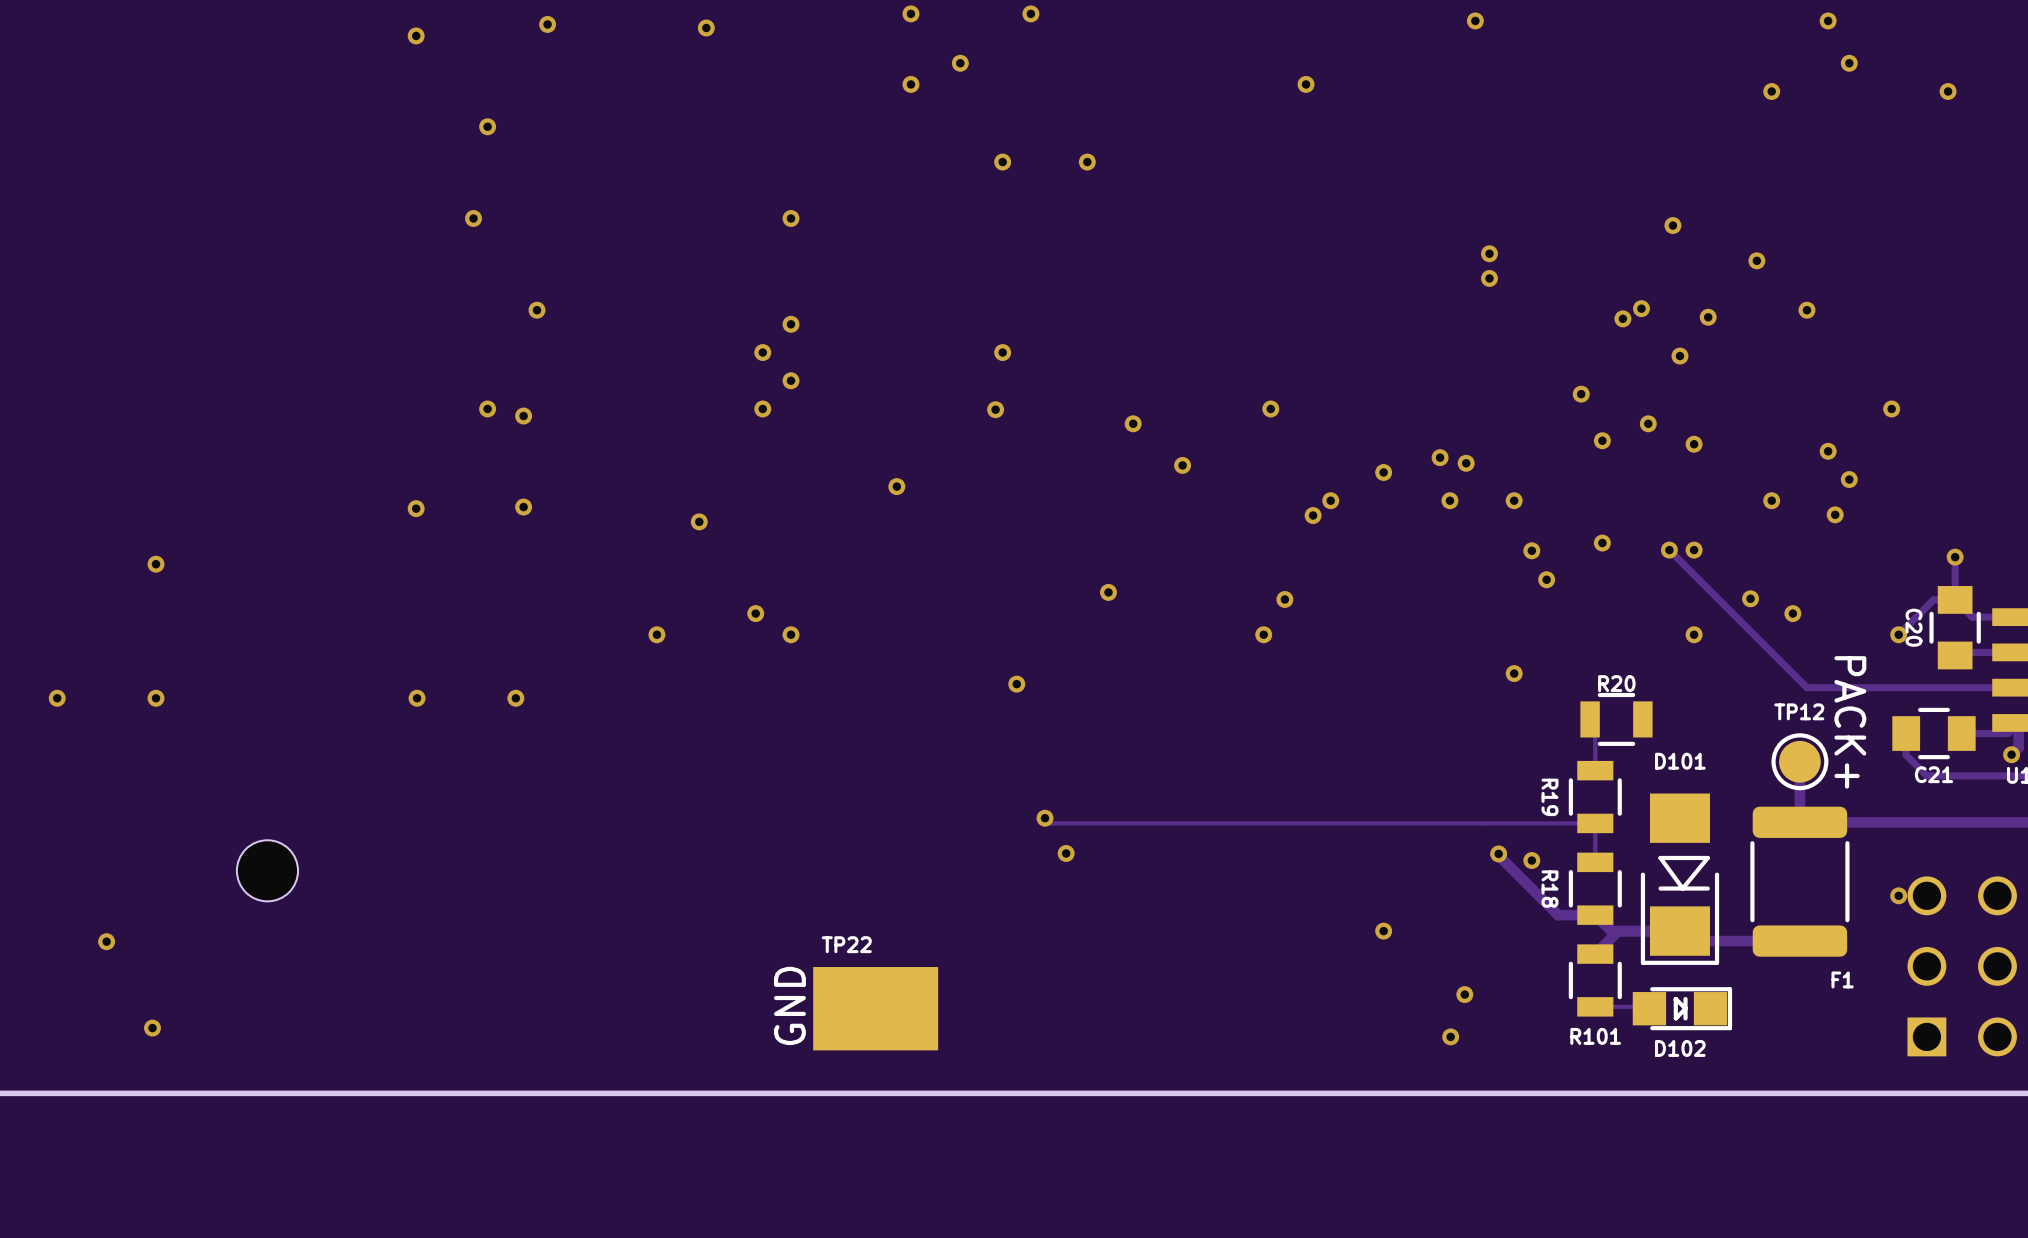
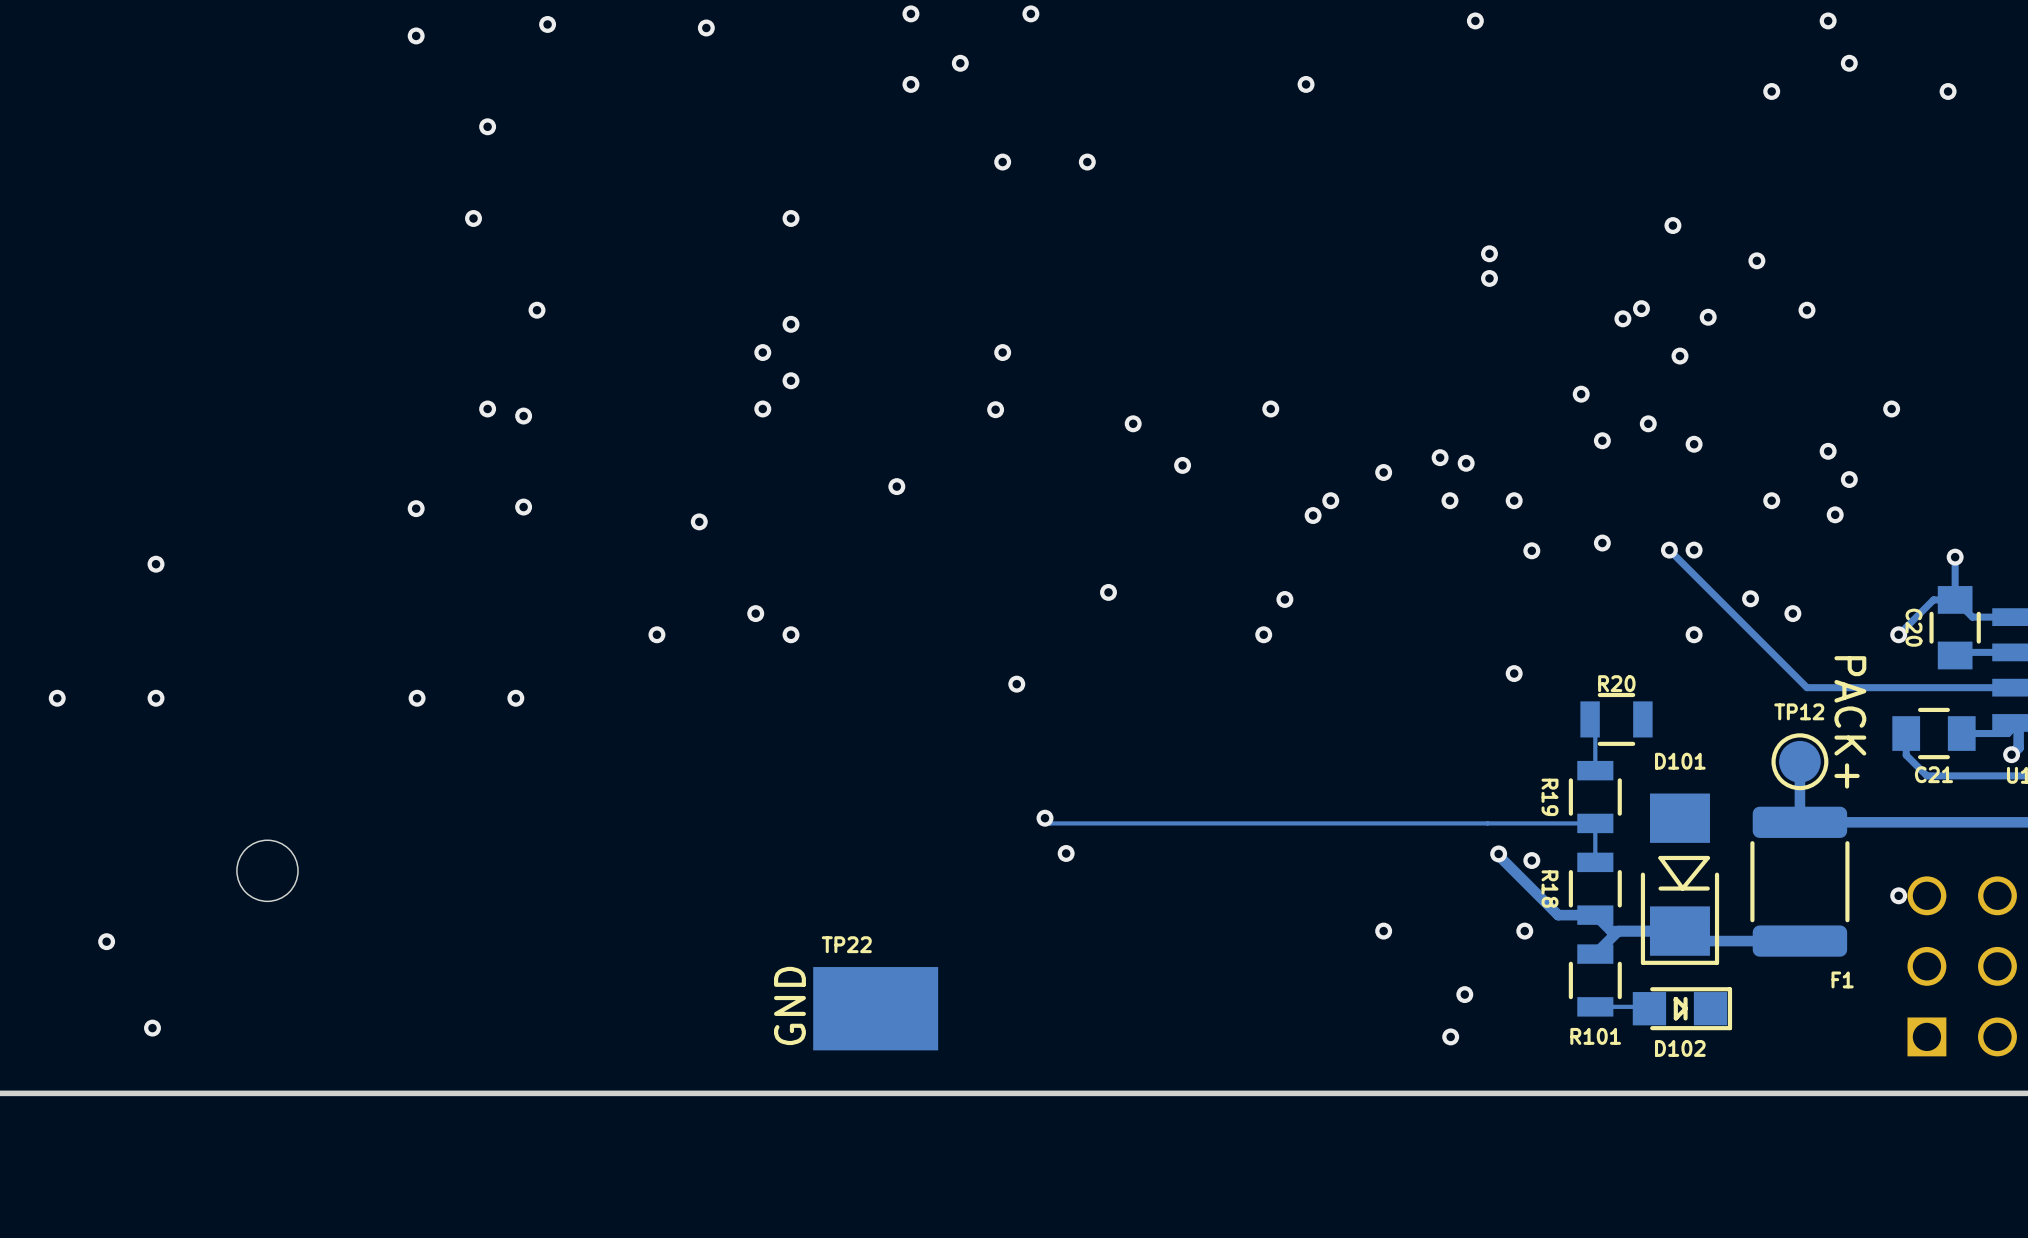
via: (1546, 579) -> none
via: none -> (1524, 931)

